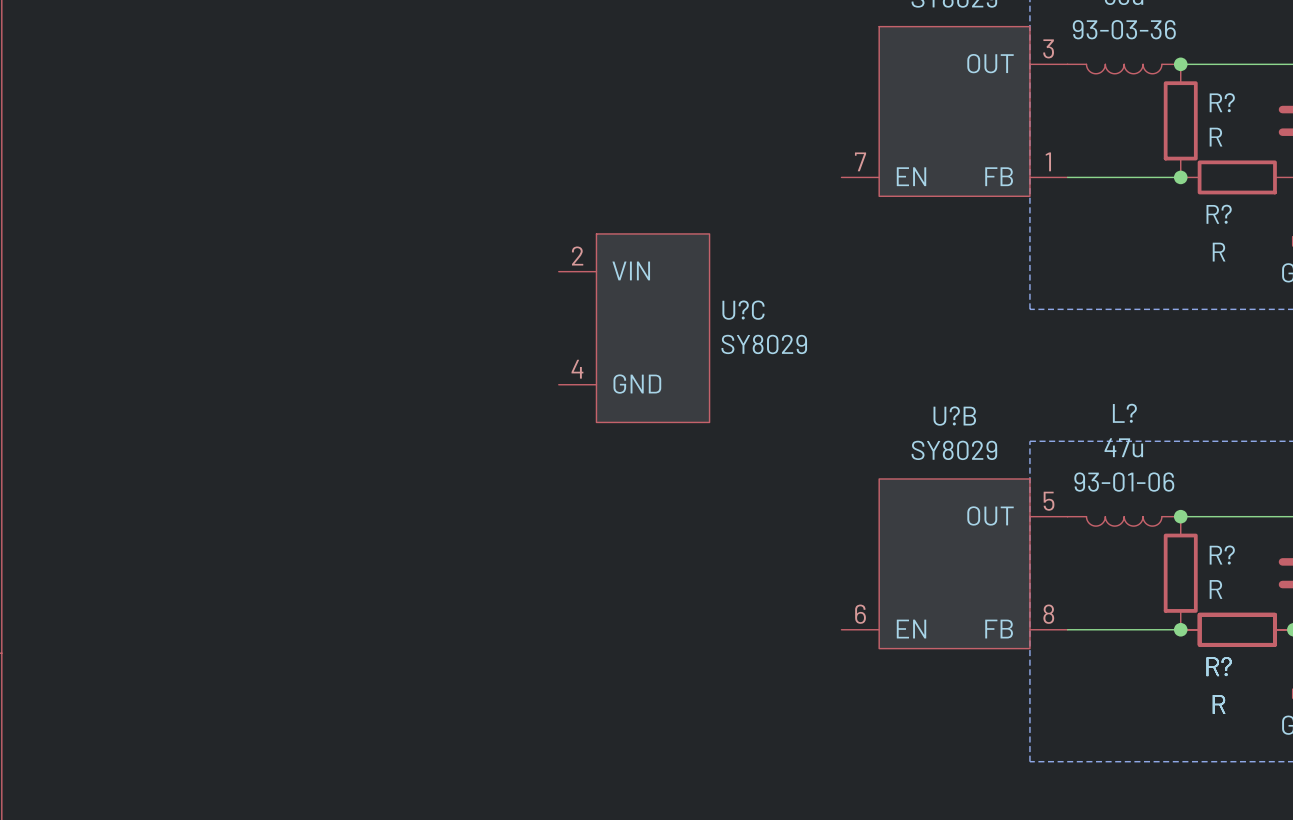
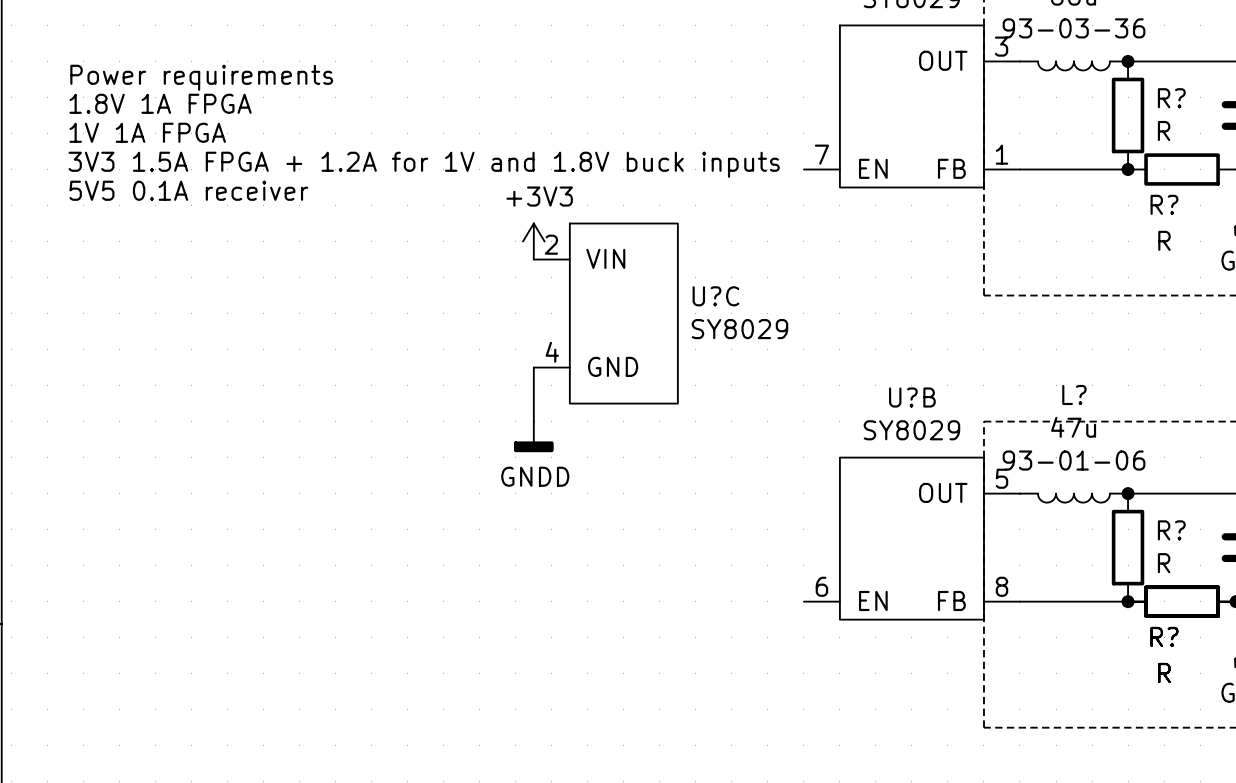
text: none -> Power requirements (201, 77)
text: none -> 1.8V 1A FPGA (160, 103)
text: none -> 1V 1A FPGA (147, 132)
text: none -> 3V3 1.5A FPGA + 1.2A for 1V and 1.8V buck inputs (424, 164)
text: none -> 5V5 0.1A receiver (188, 190)
power symbol: none -> +3V3 (533, 241)
wire: none -> (533, 367) (533, 421)
power symbol: none -> GNDD (533, 436)

